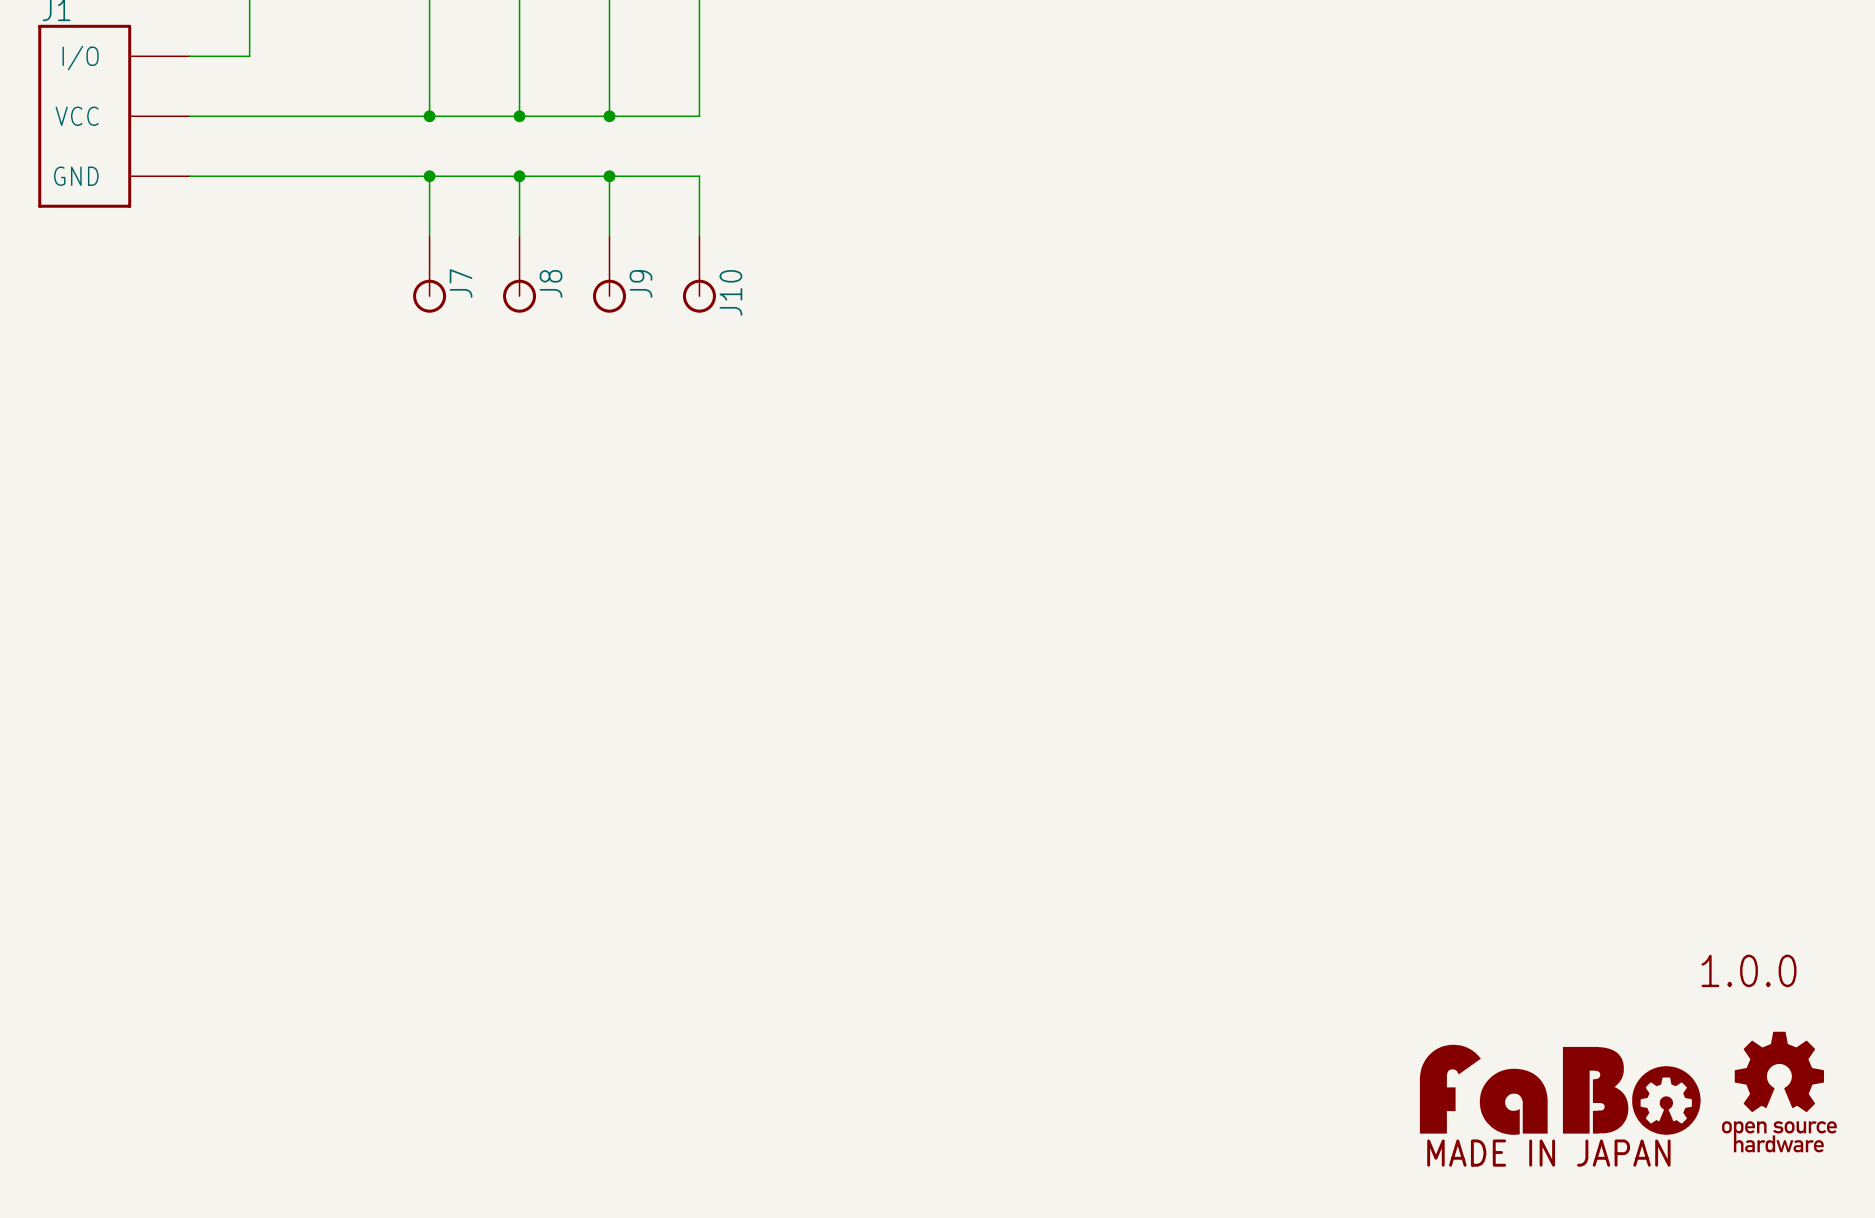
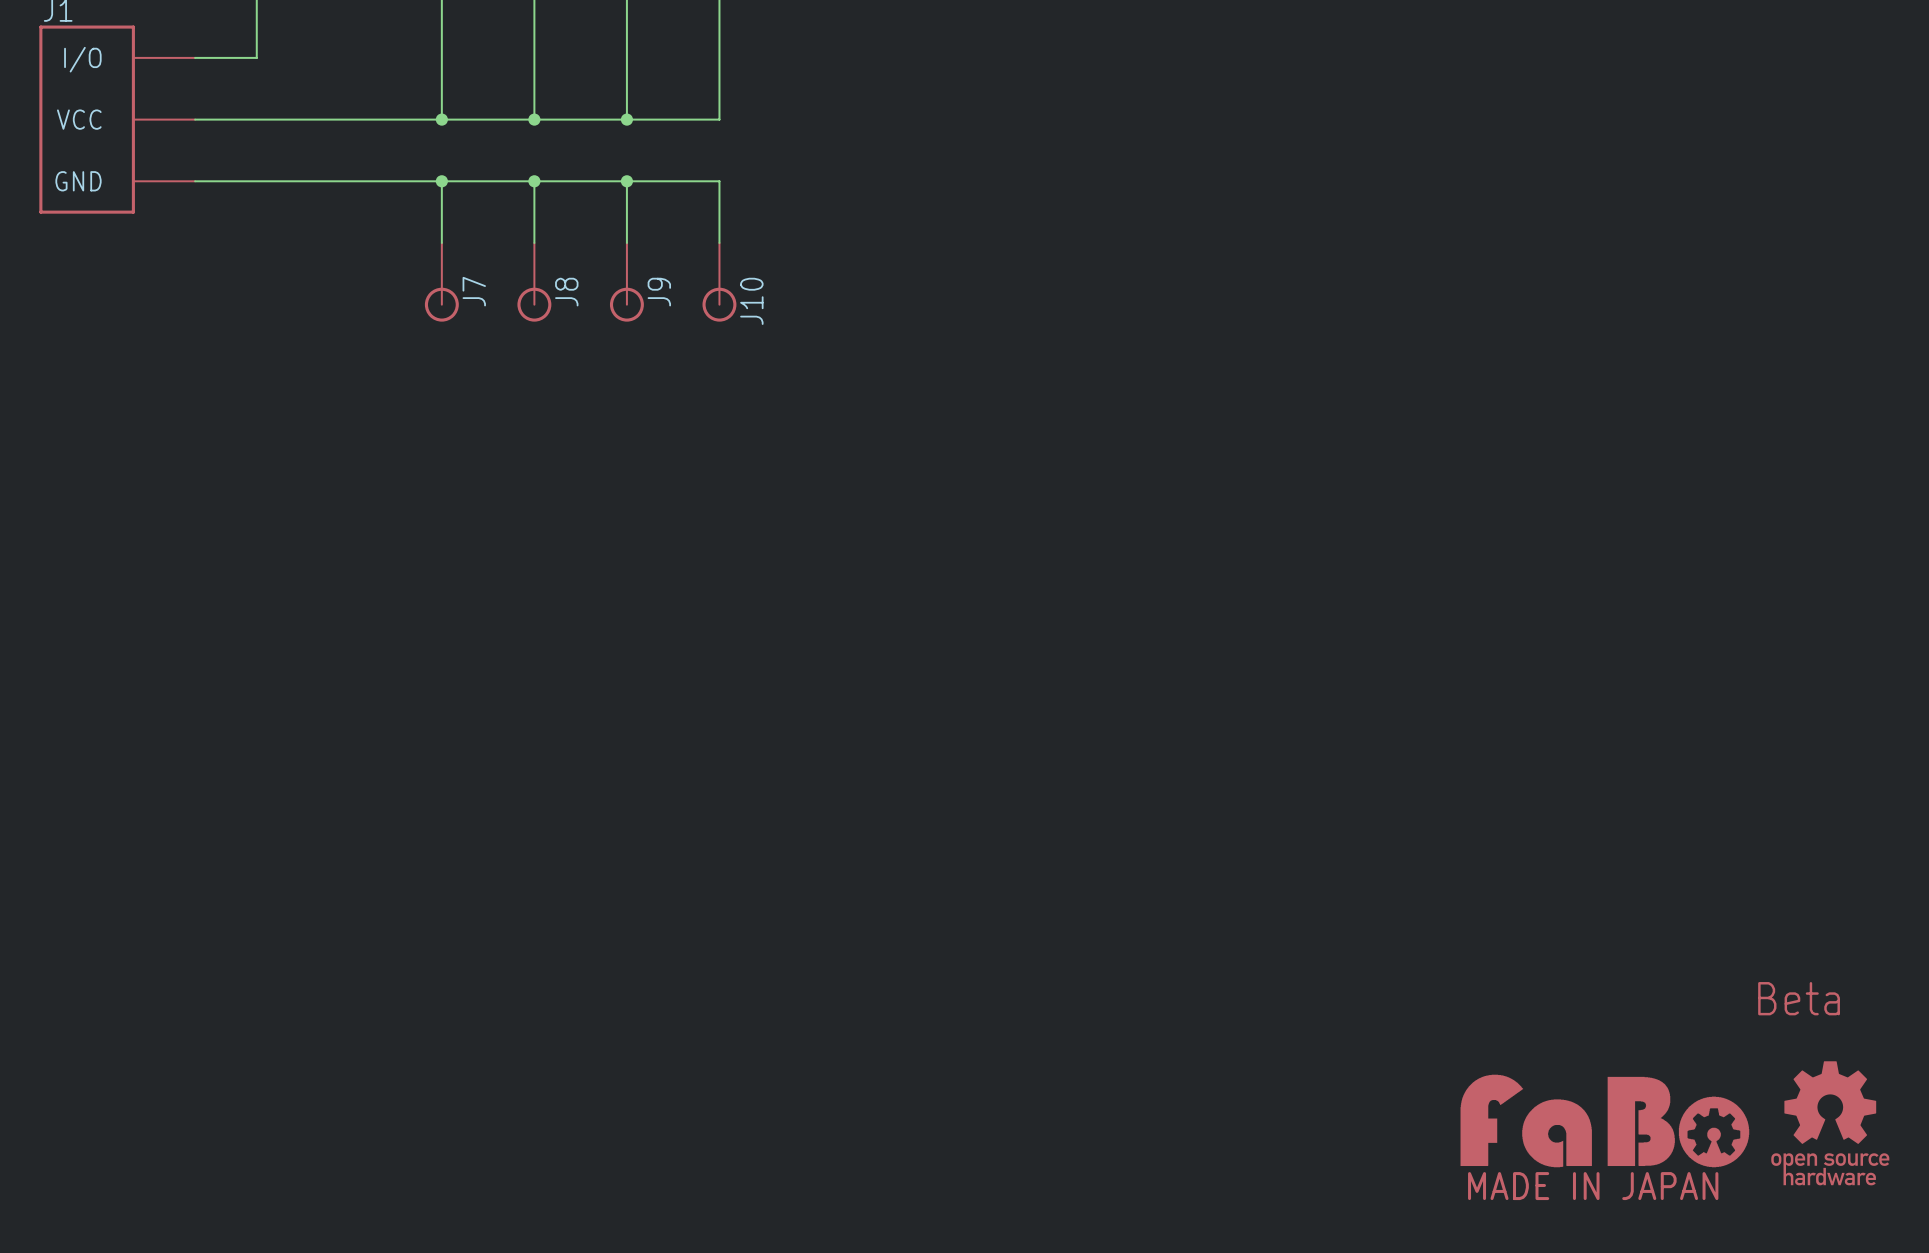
text: 1.0.0 (1749, 970) -> Beta (1799, 998)

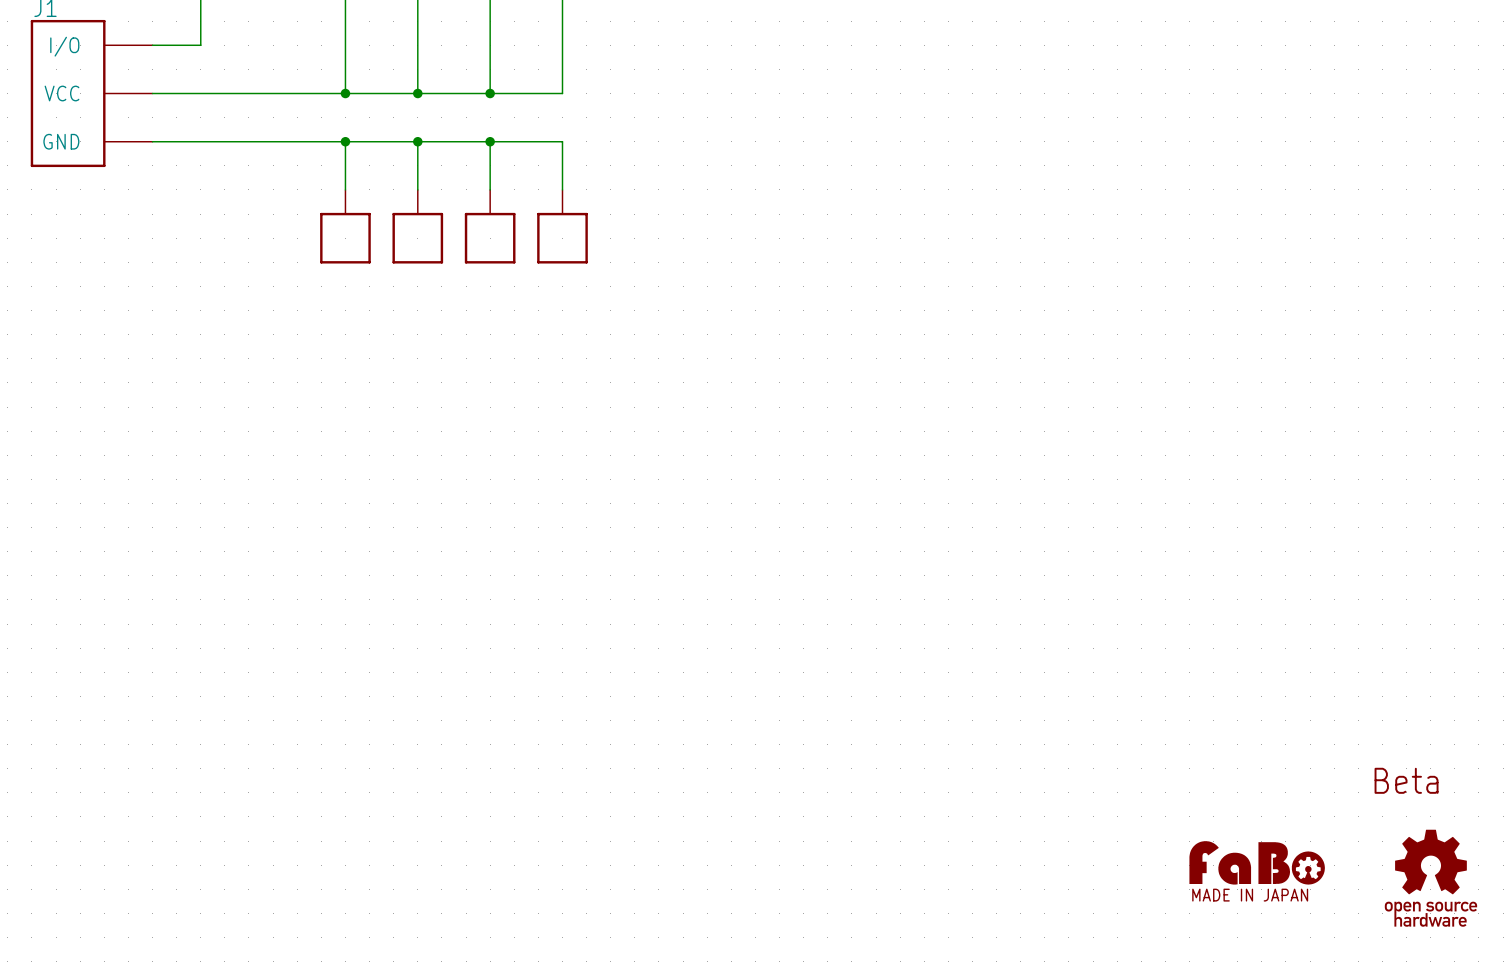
J7: (441, 282) -> none
J8: (534, 282) -> none
J9: (626, 282) -> none
J10: (719, 282) -> none
part: none -> (345, 226)
part: none -> (417, 226)
part: none -> (490, 226)
part: none -> (562, 226)
part: none -> (1257, 862)
part: (1604, 1120) -> none

